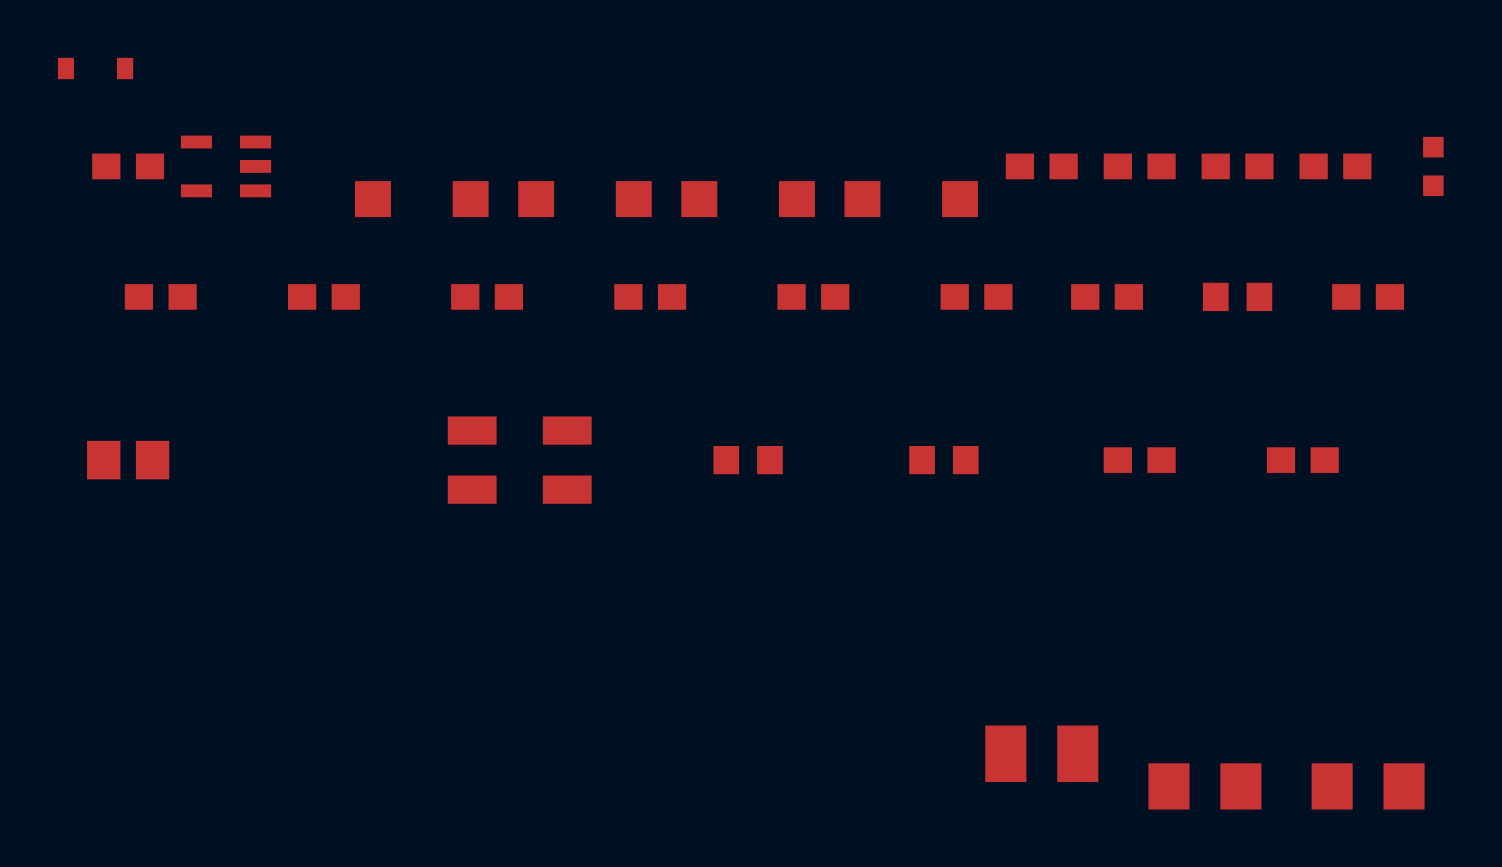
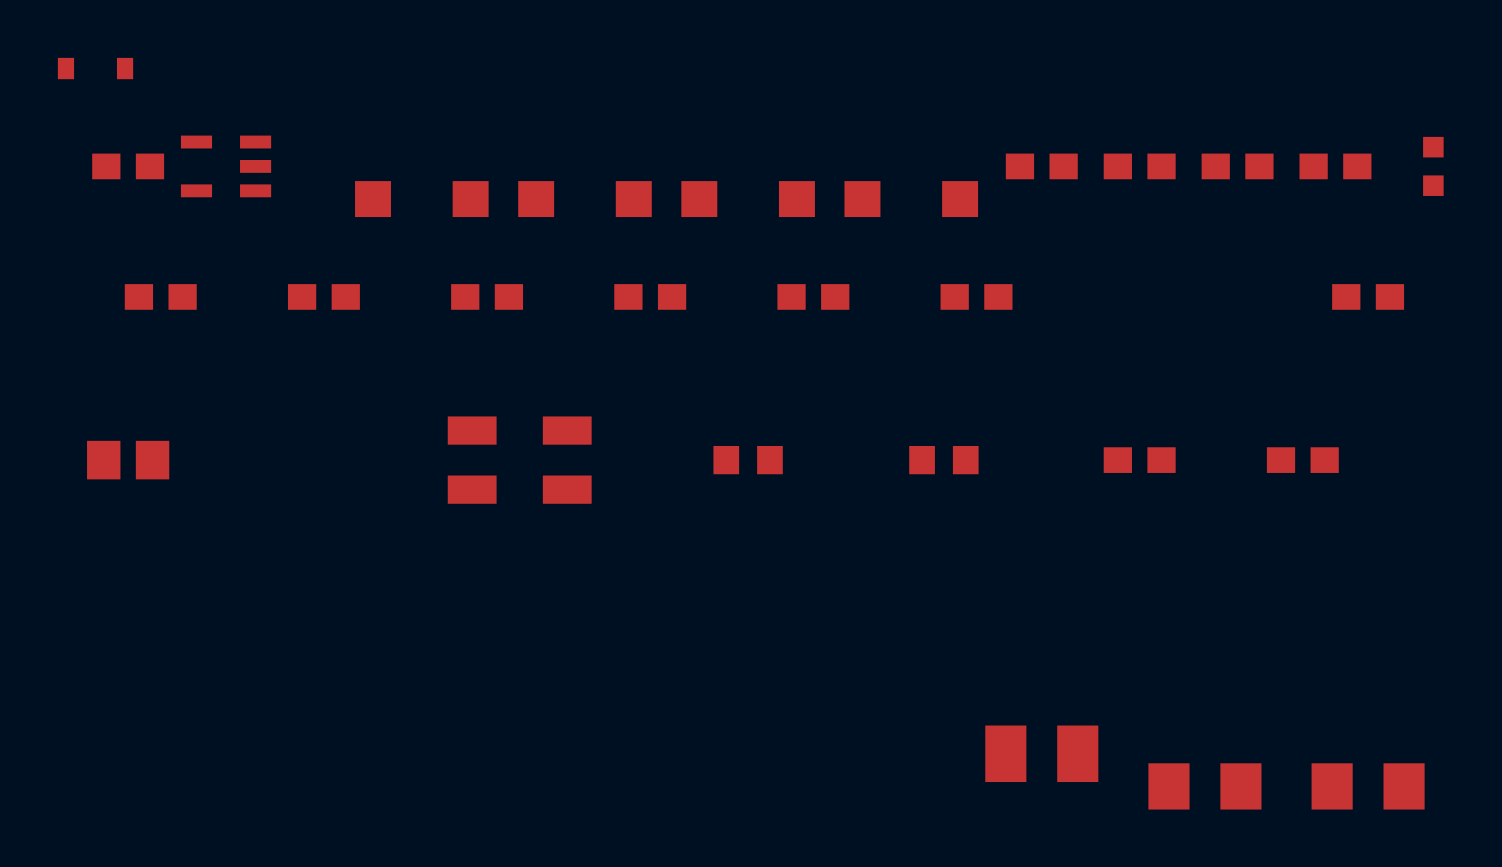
part: (1107, 296) -> none
part: (1237, 296) -> none

